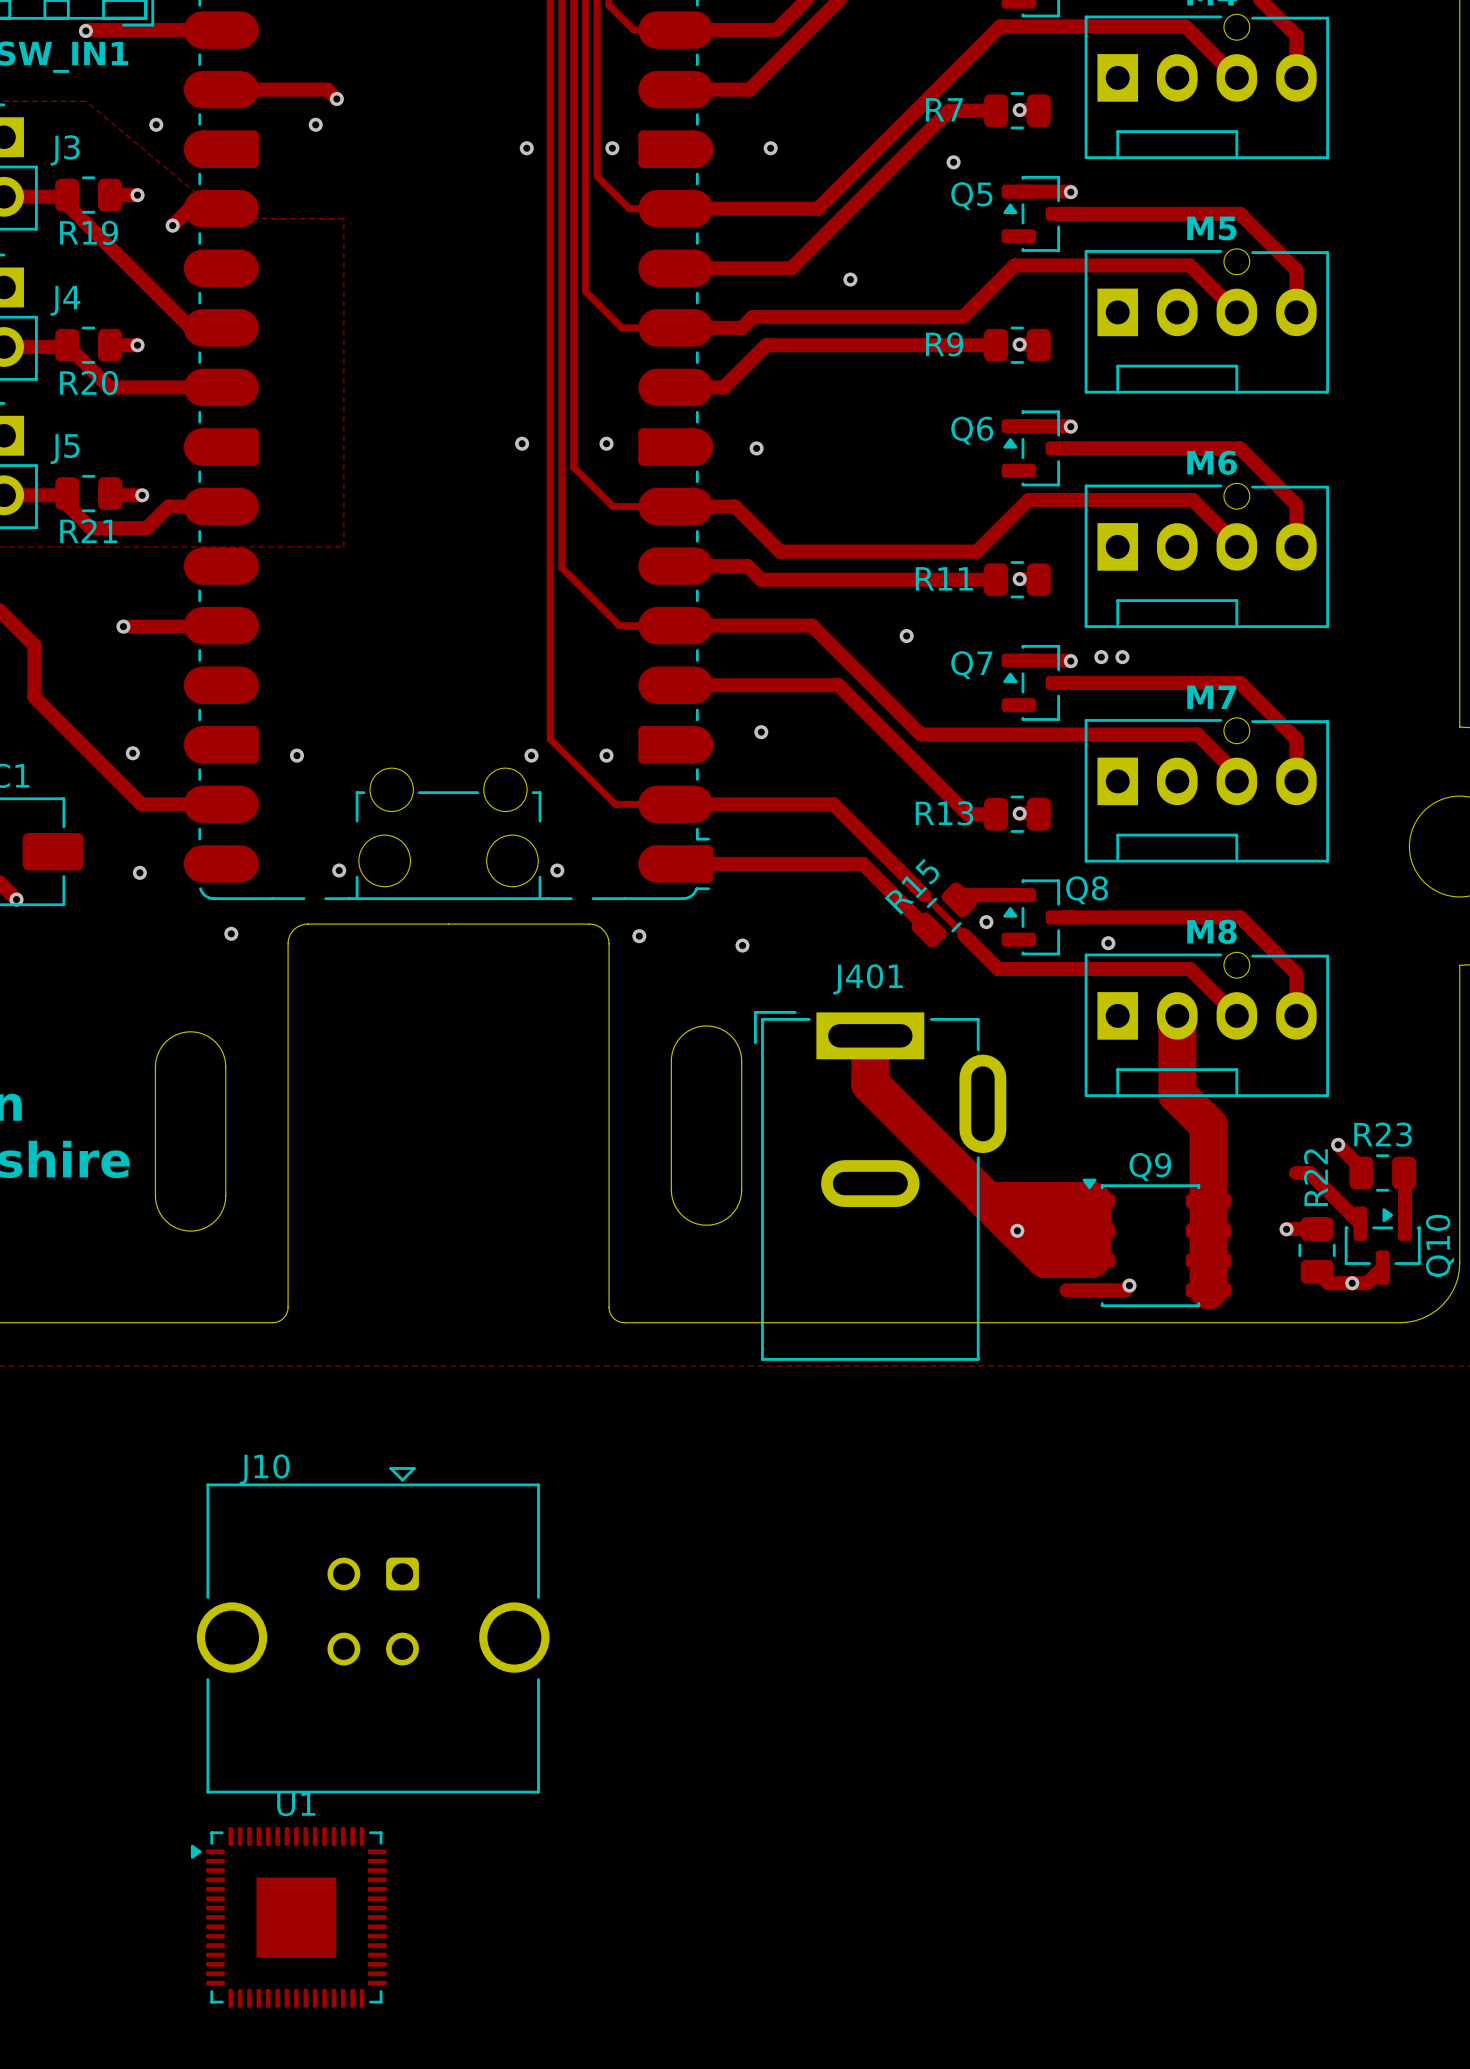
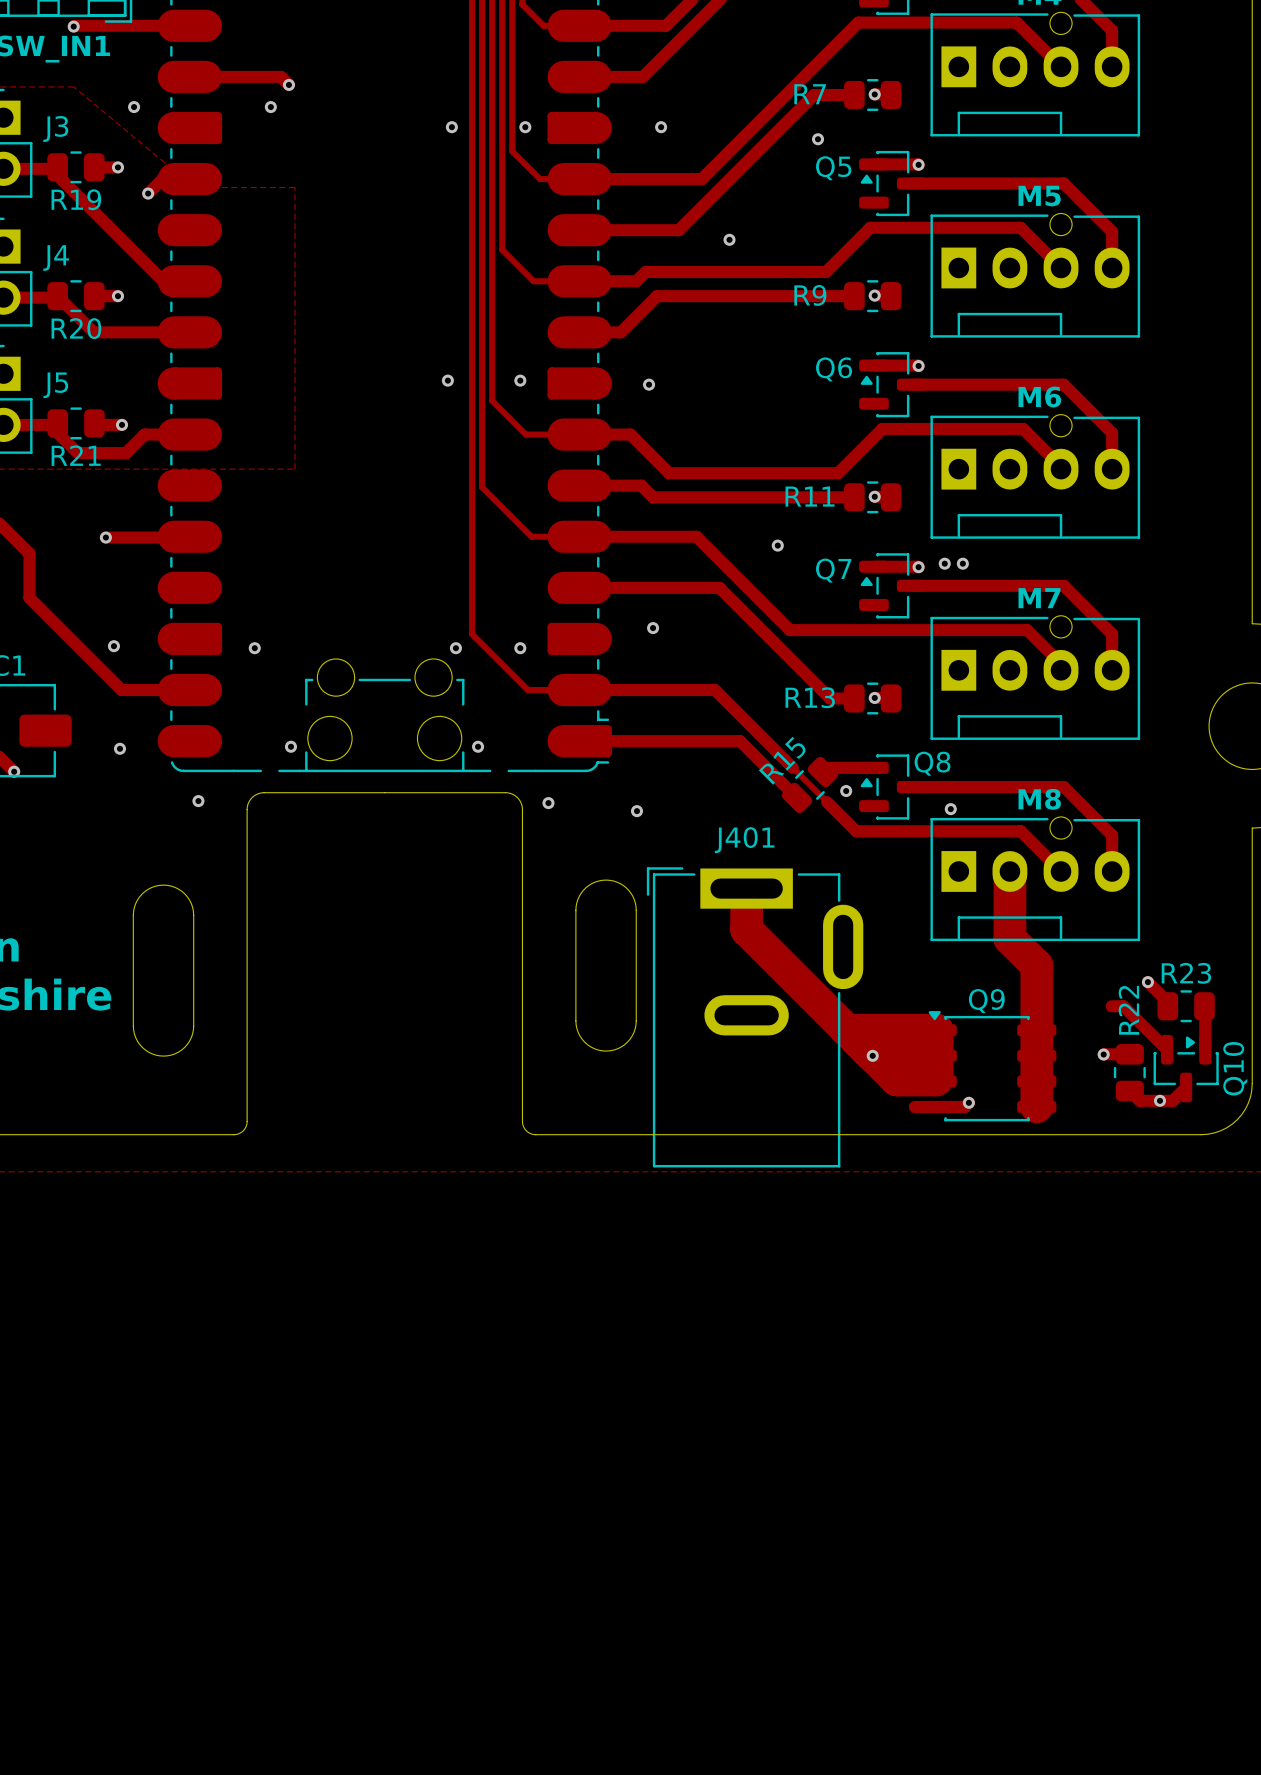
J10: (373, 1630) -> none
U1: (288, 1917) -> none

